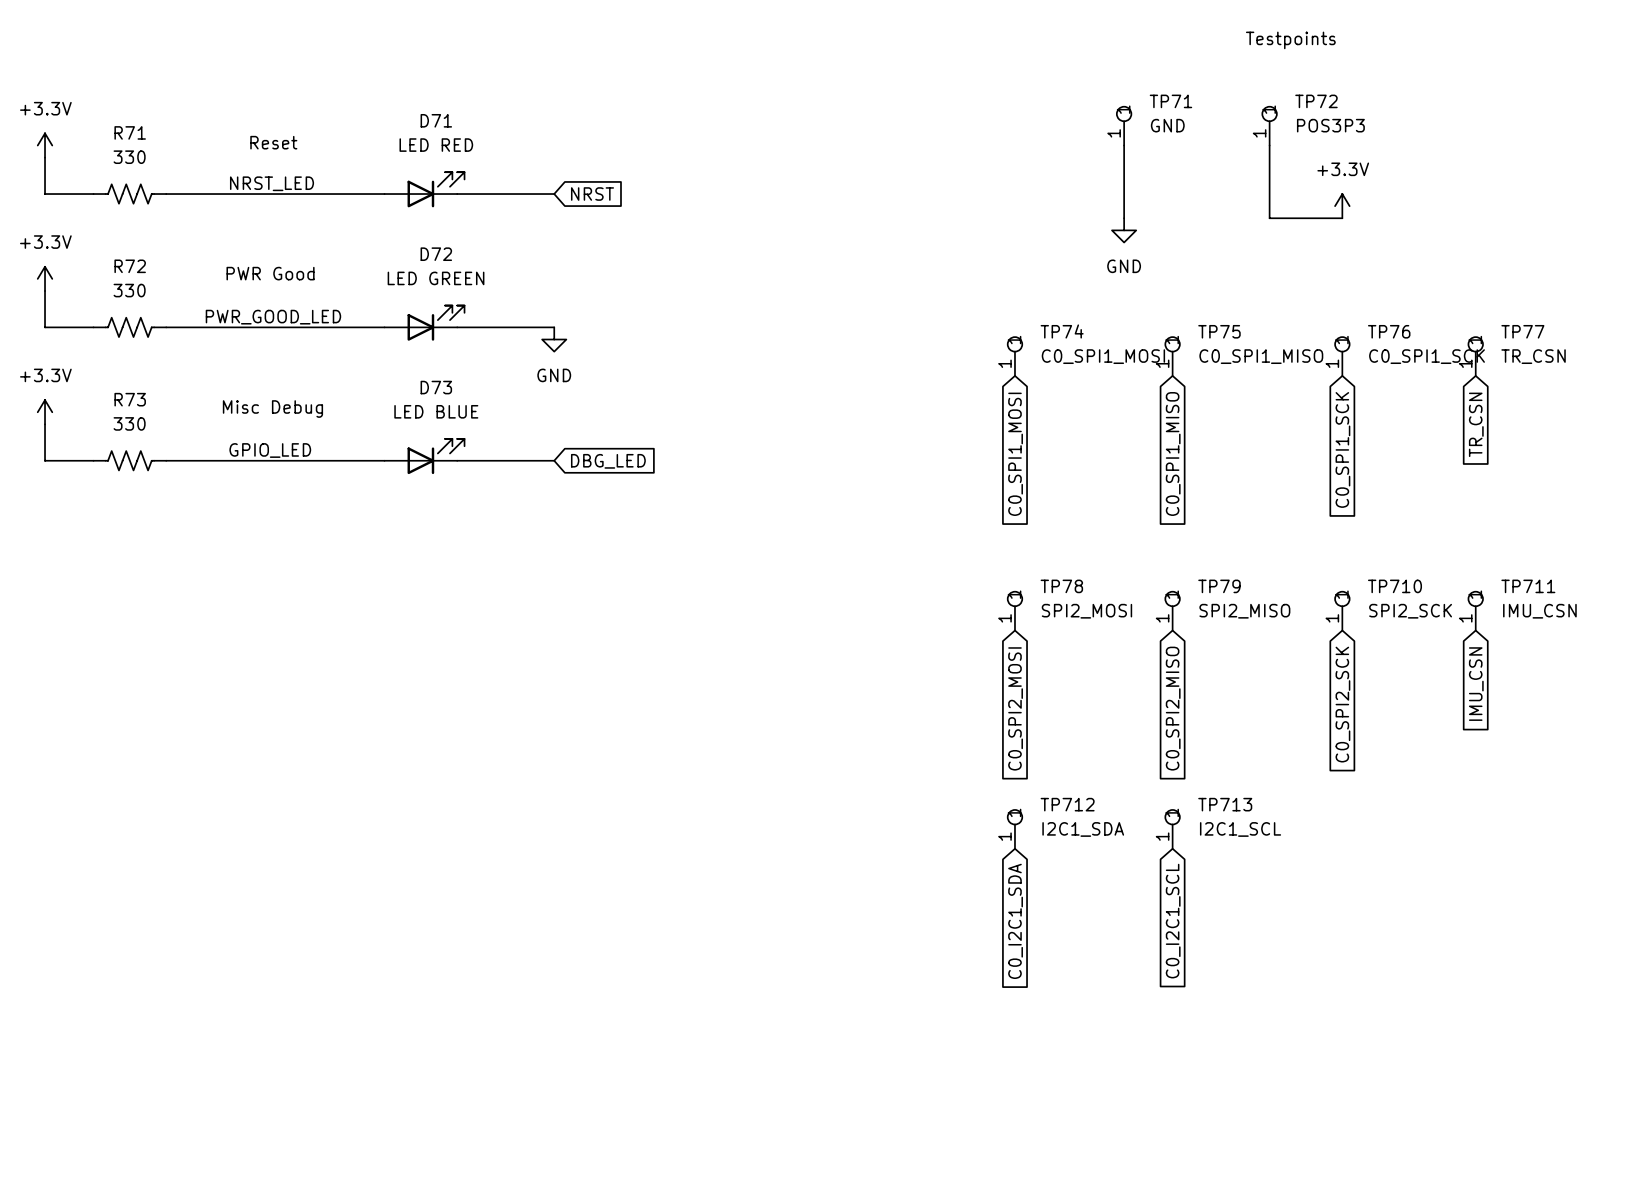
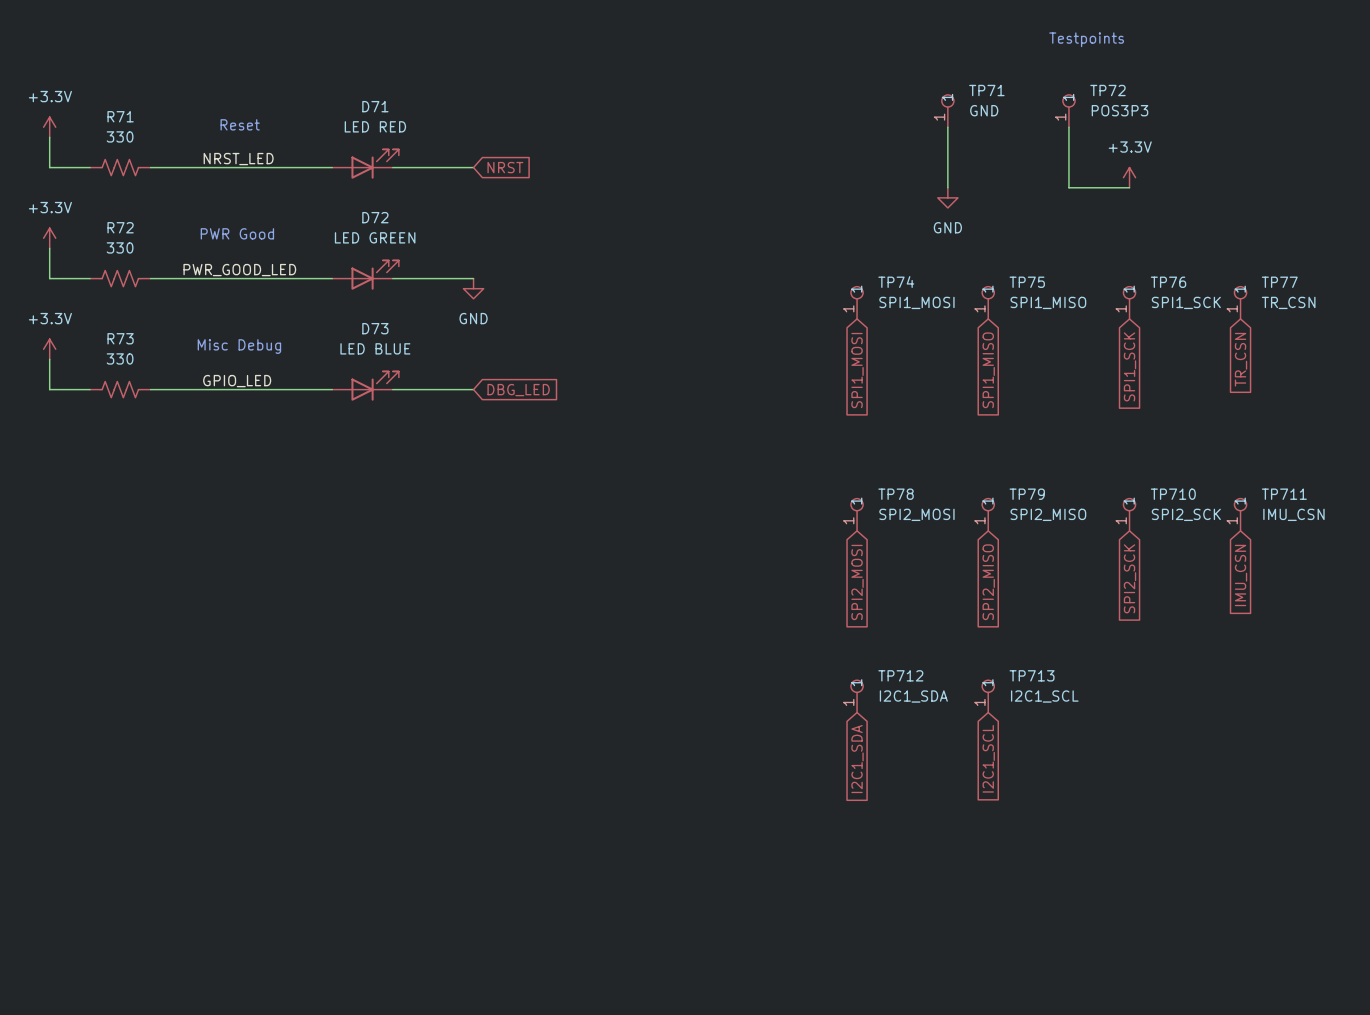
TP74 value: C0_SPI1_MOSI (1103, 356) -> SPI1_MOSI (916, 302)
TP75 value: C0_SPI1_MISO (1261, 356) -> SPI1_MISO (1048, 302)
TP76 value: C0_SPI1_SCK (1427, 356) -> SPI1_SCK (1186, 302)
global label: C0_SPI1_SCK (1342, 449) -> SPI1_SCK (1130, 366)
global label: C0_SPI1_MISO (1173, 453) -> SPI1_MISO (988, 370)
global label: C0_SPI1_MOSI (1015, 454) -> SPI1_MOSI (857, 370)
global label: C0_SPI2_SCK (1342, 704) -> SPI2_SCK (1130, 578)
global label: C0_SPI2_MOSI (1015, 708) -> SPI2_MOSI (857, 582)
global label: C0_SPI2_MISO (1173, 708) -> SPI2_MISO (988, 582)
global label: C0_I2C1_SDA (1015, 921) -> I2C1_SDA (857, 759)
global label: C0_I2C1_SCL (1173, 921) -> I2C1_SCL (988, 758)

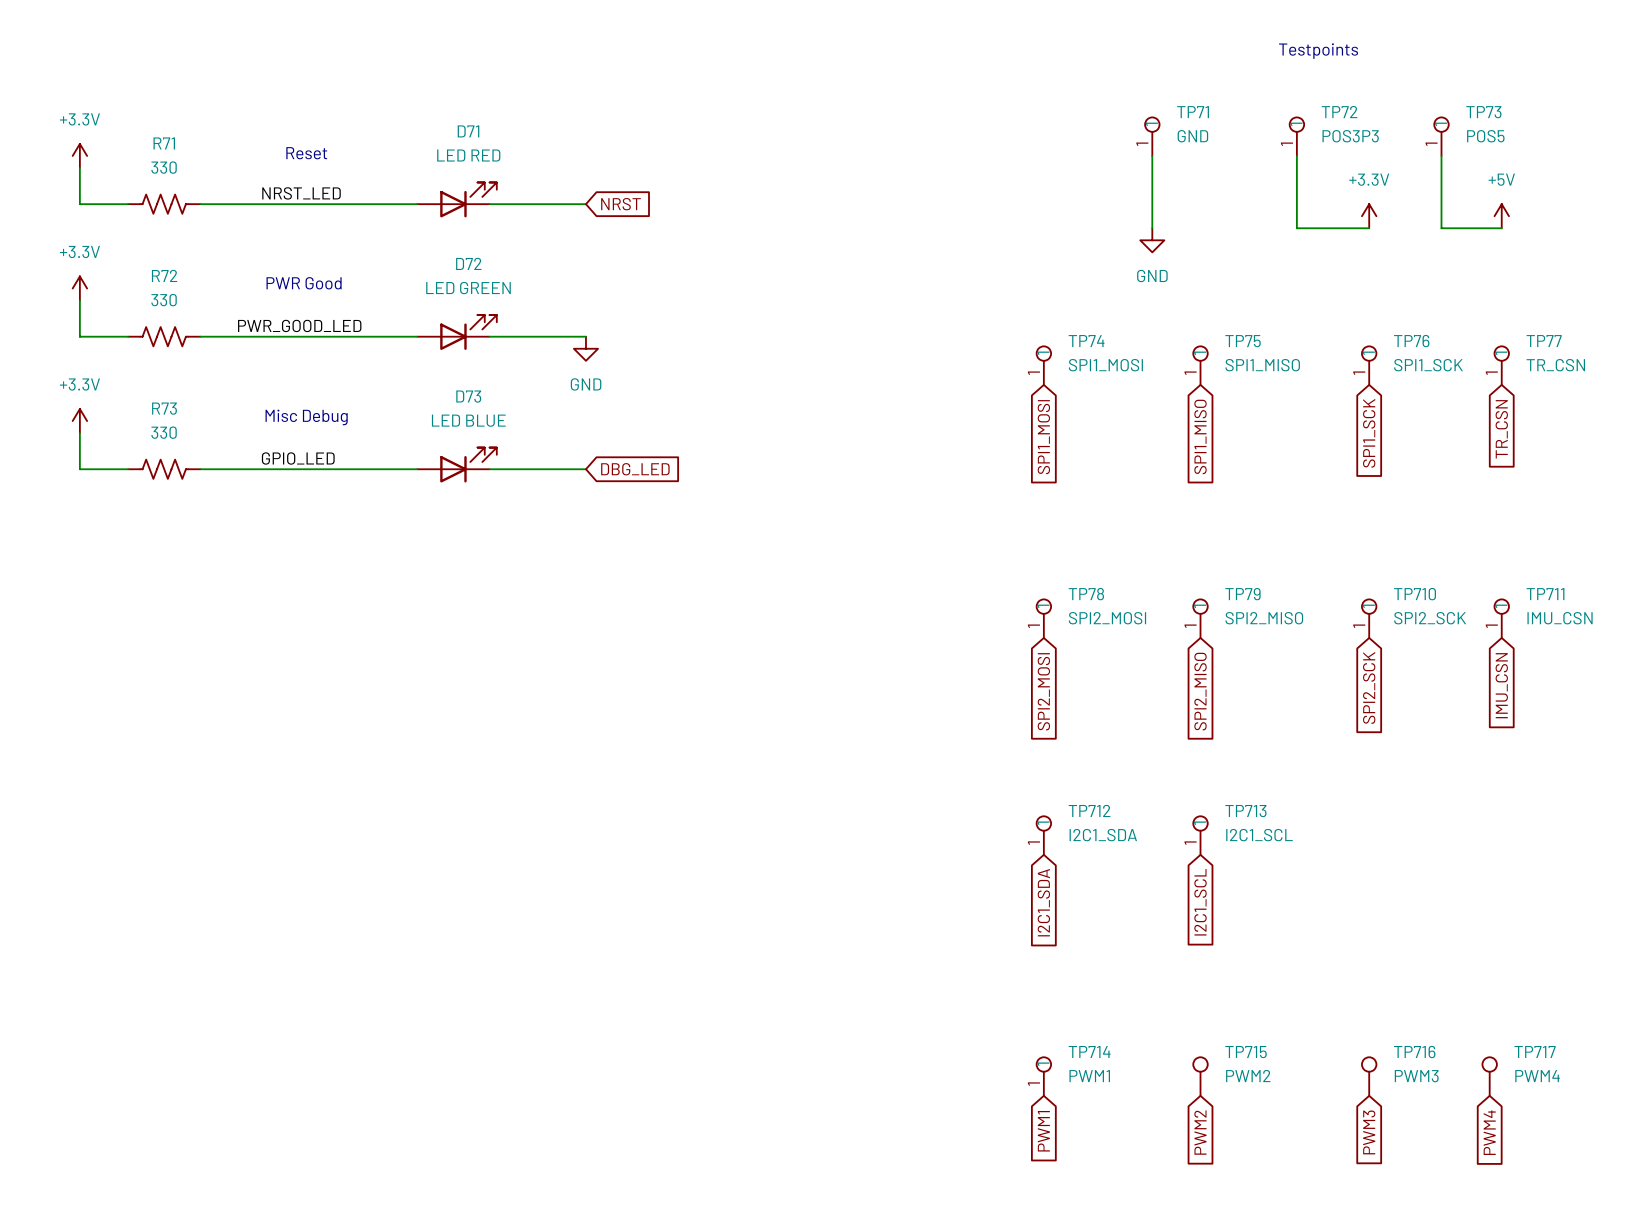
TP73: none -> POS5 (1441, 136)
wire: none -> (1441, 155) (1441, 228) (1501, 228)
power symbol: none -> +5V (1501, 216)
TP714: none -> PWM1 (1043, 1076)
TP715: none -> PWM2 (1200, 1076)
TP716: none -> PWM3 (1369, 1076)
TP717: none -> PWM4 (1489, 1076)
global label: none -> PWM1 (1043, 1131)
global label: none -> PWM2 (1200, 1132)
global label: none -> PWM3 (1369, 1132)
global label: none -> PWM4 (1489, 1132)

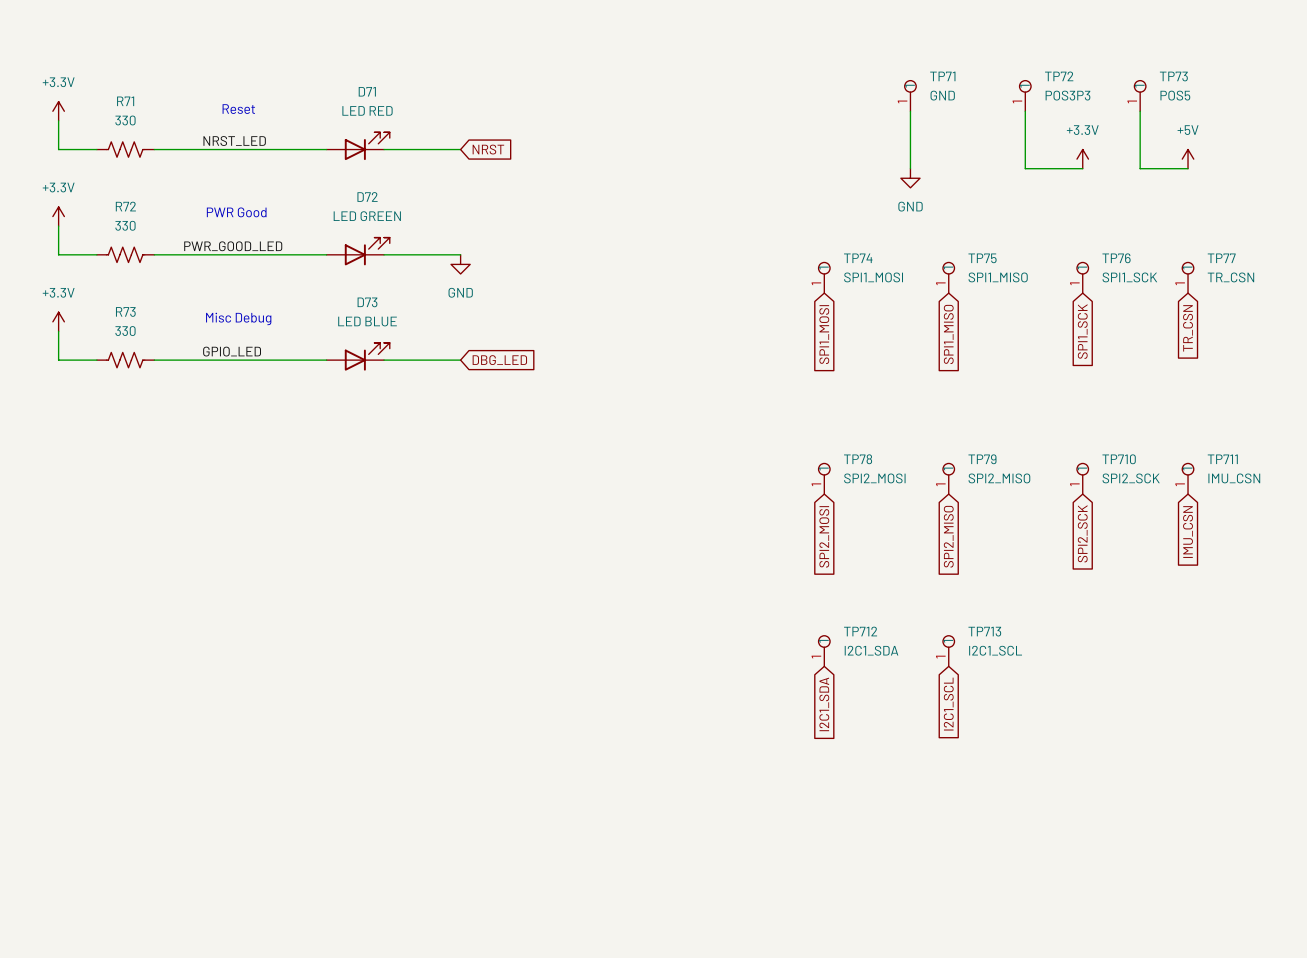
text: Testpoints (1318, 51) -> none
TP714: PWM1 (1043, 1076) -> none
TP715: PWM2 (1200, 1076) -> none
TP716: PWM3 (1369, 1076) -> none
TP717: PWM4 (1489, 1076) -> none
global label: PWM1 (1043, 1131) -> none
global label: PWM2 (1200, 1132) -> none
global label: PWM3 (1369, 1132) -> none
global label: PWM4 (1489, 1132) -> none

